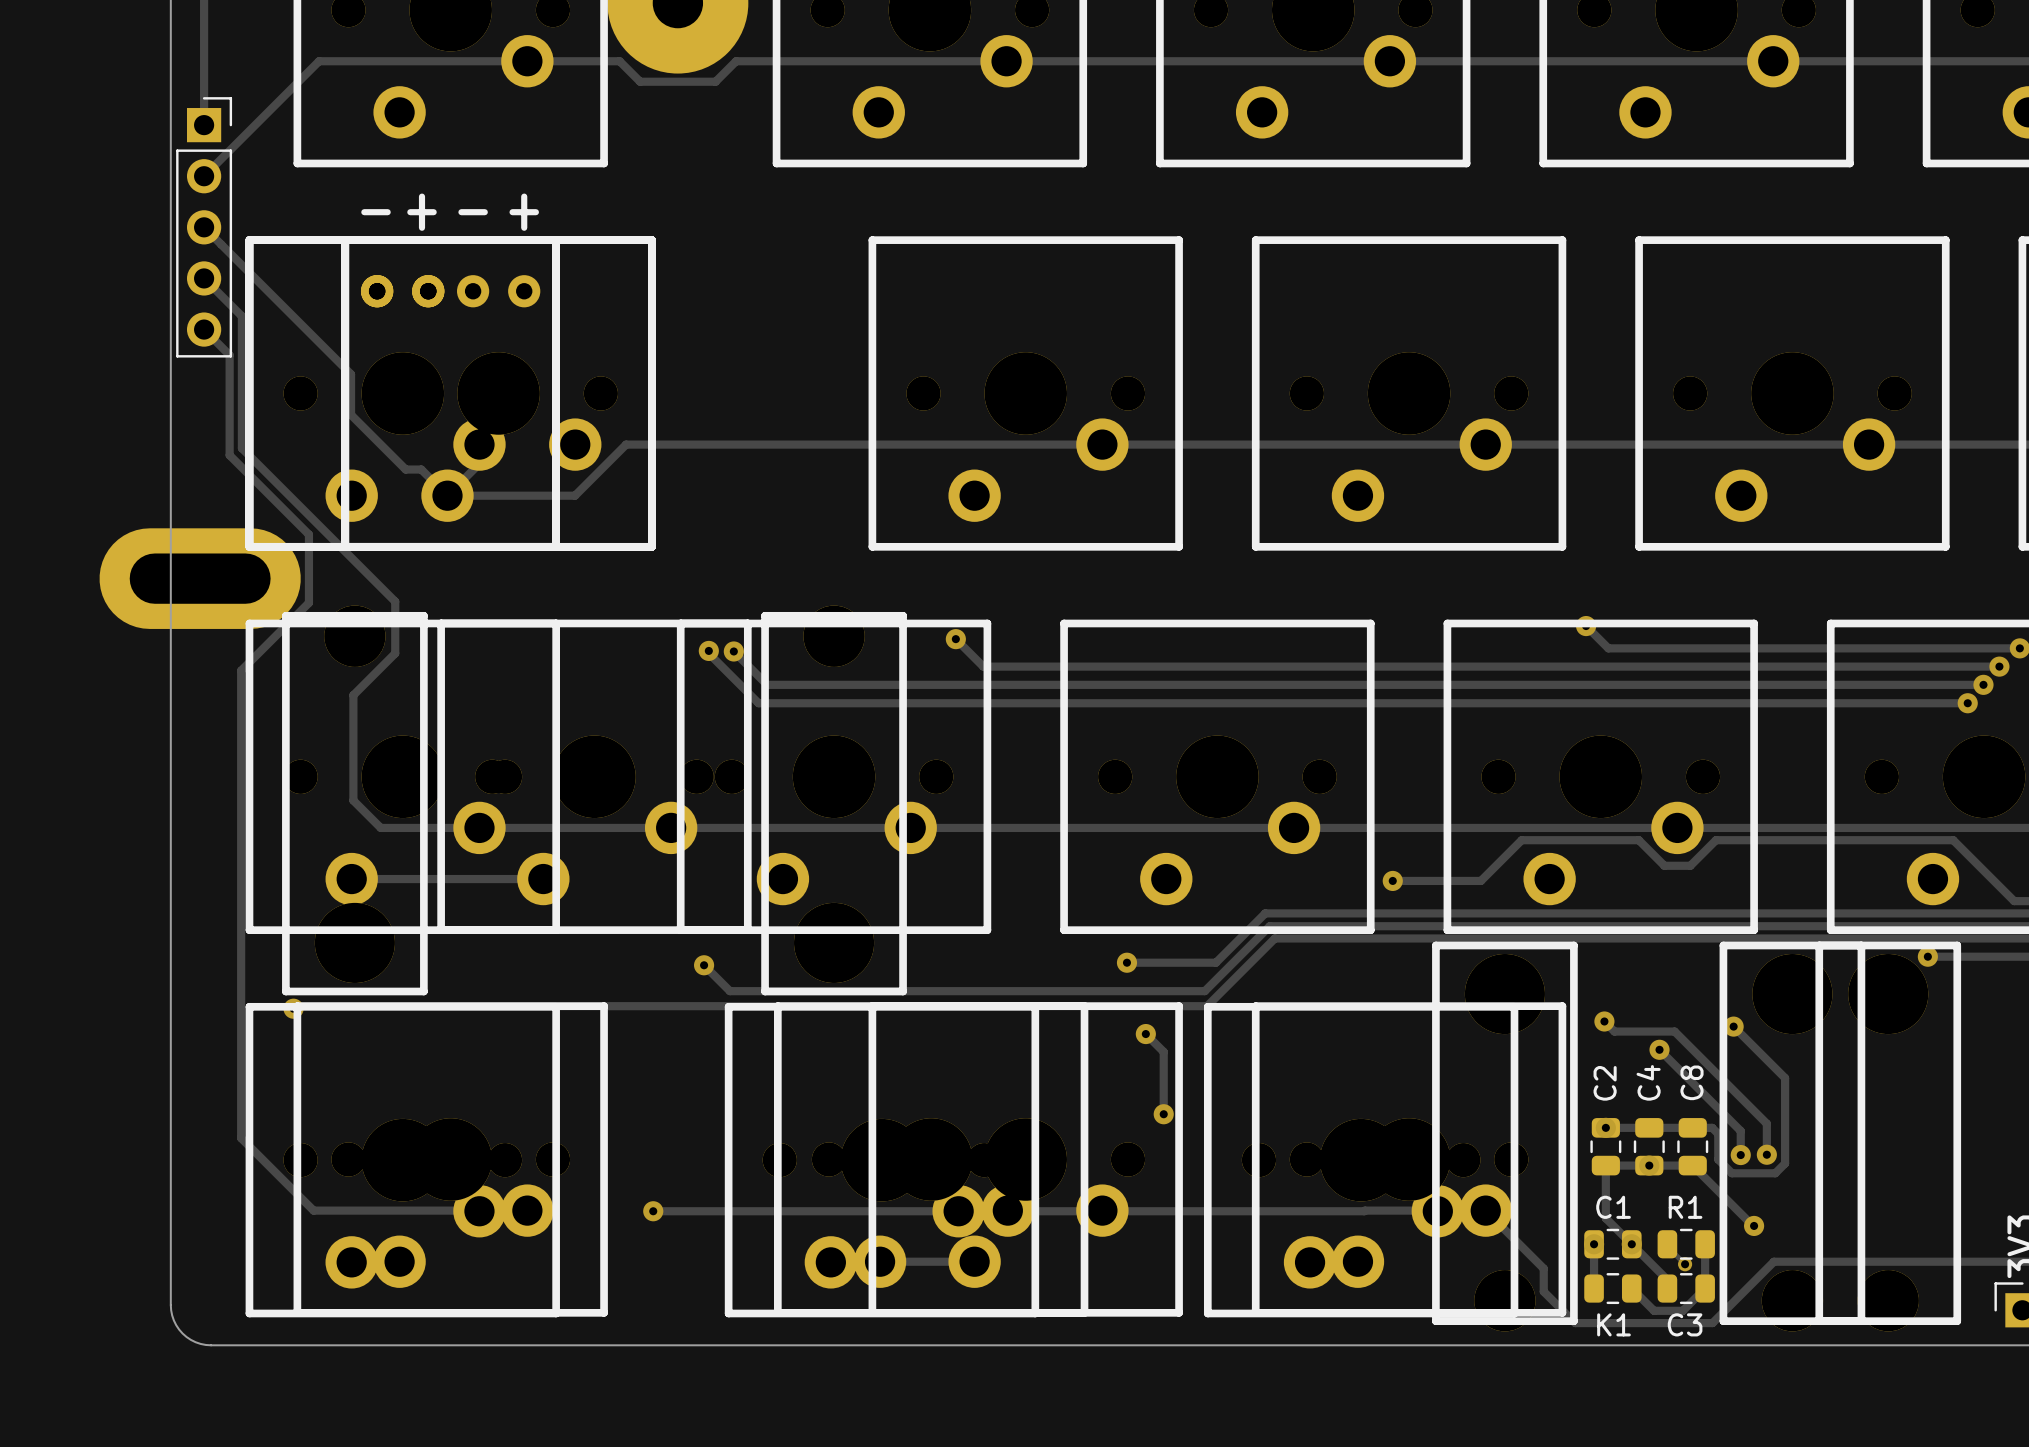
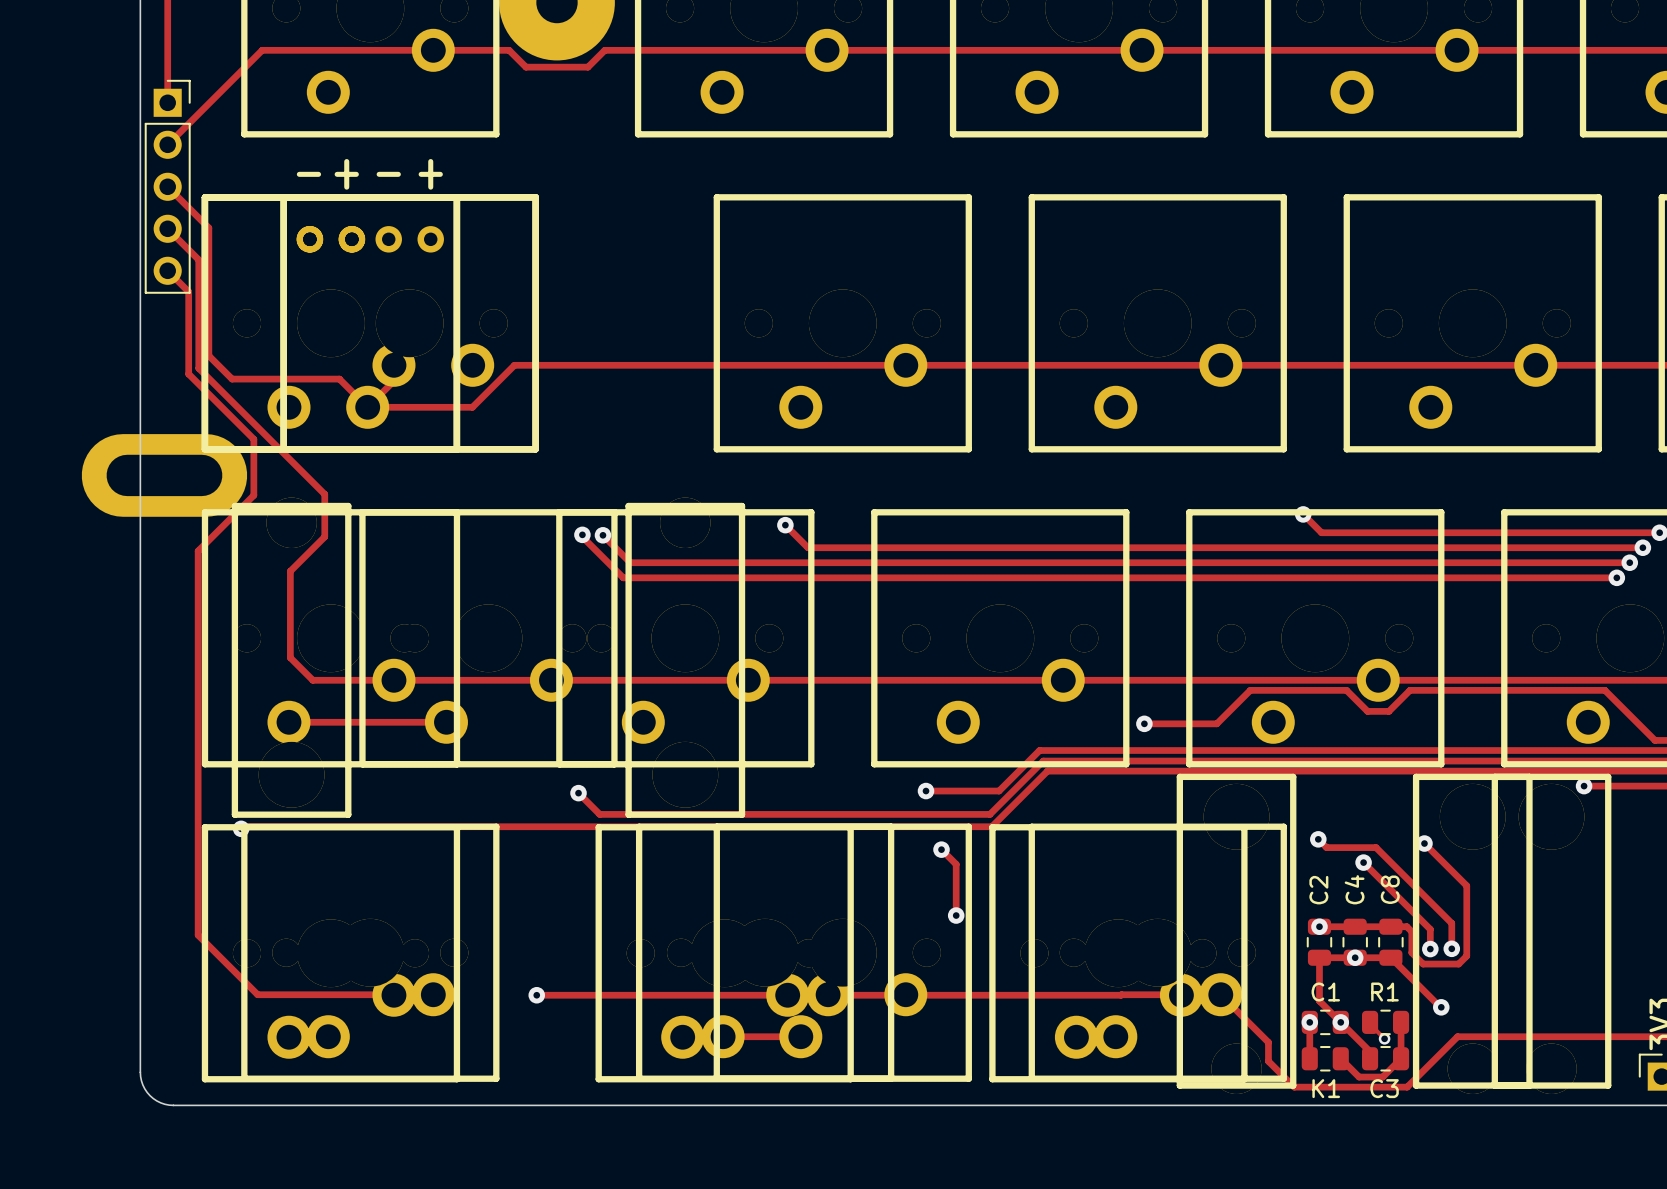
track: (254, 277) (351, 374) (351, 414) (405, 469) (421, 469) -> (208, 227) (208, 355) (232, 379) (339, 379) (346, 385)

